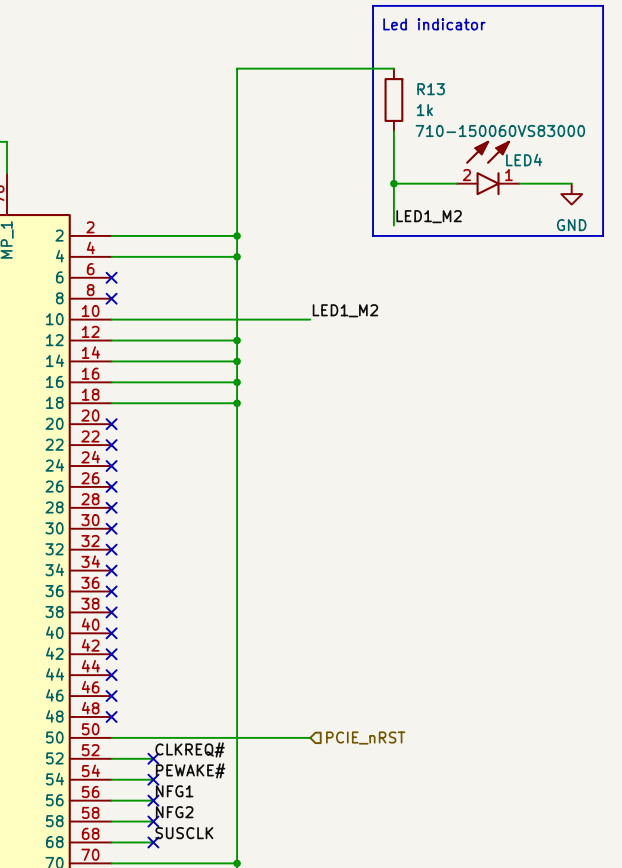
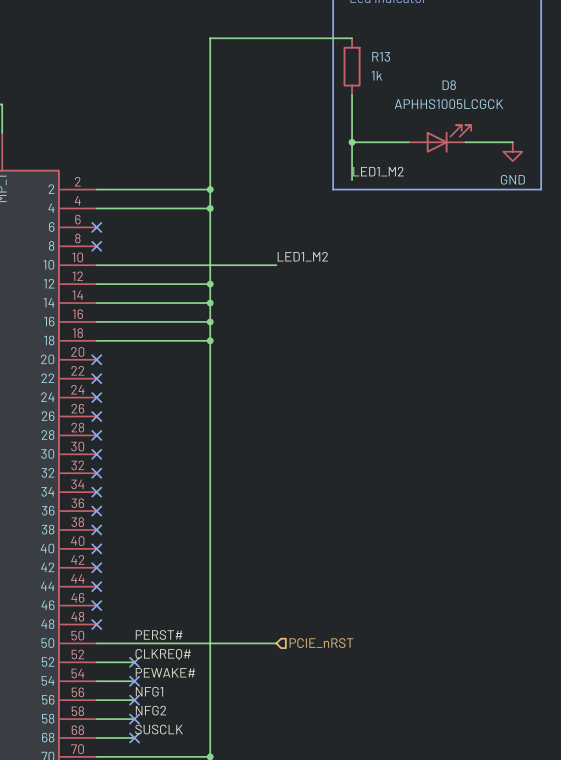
LED4: 710-150060VS83000 (488, 167) -> none
D8: none -> APHHS1005LCGCK (439, 138)
label: none -> PERST# (159, 634)

